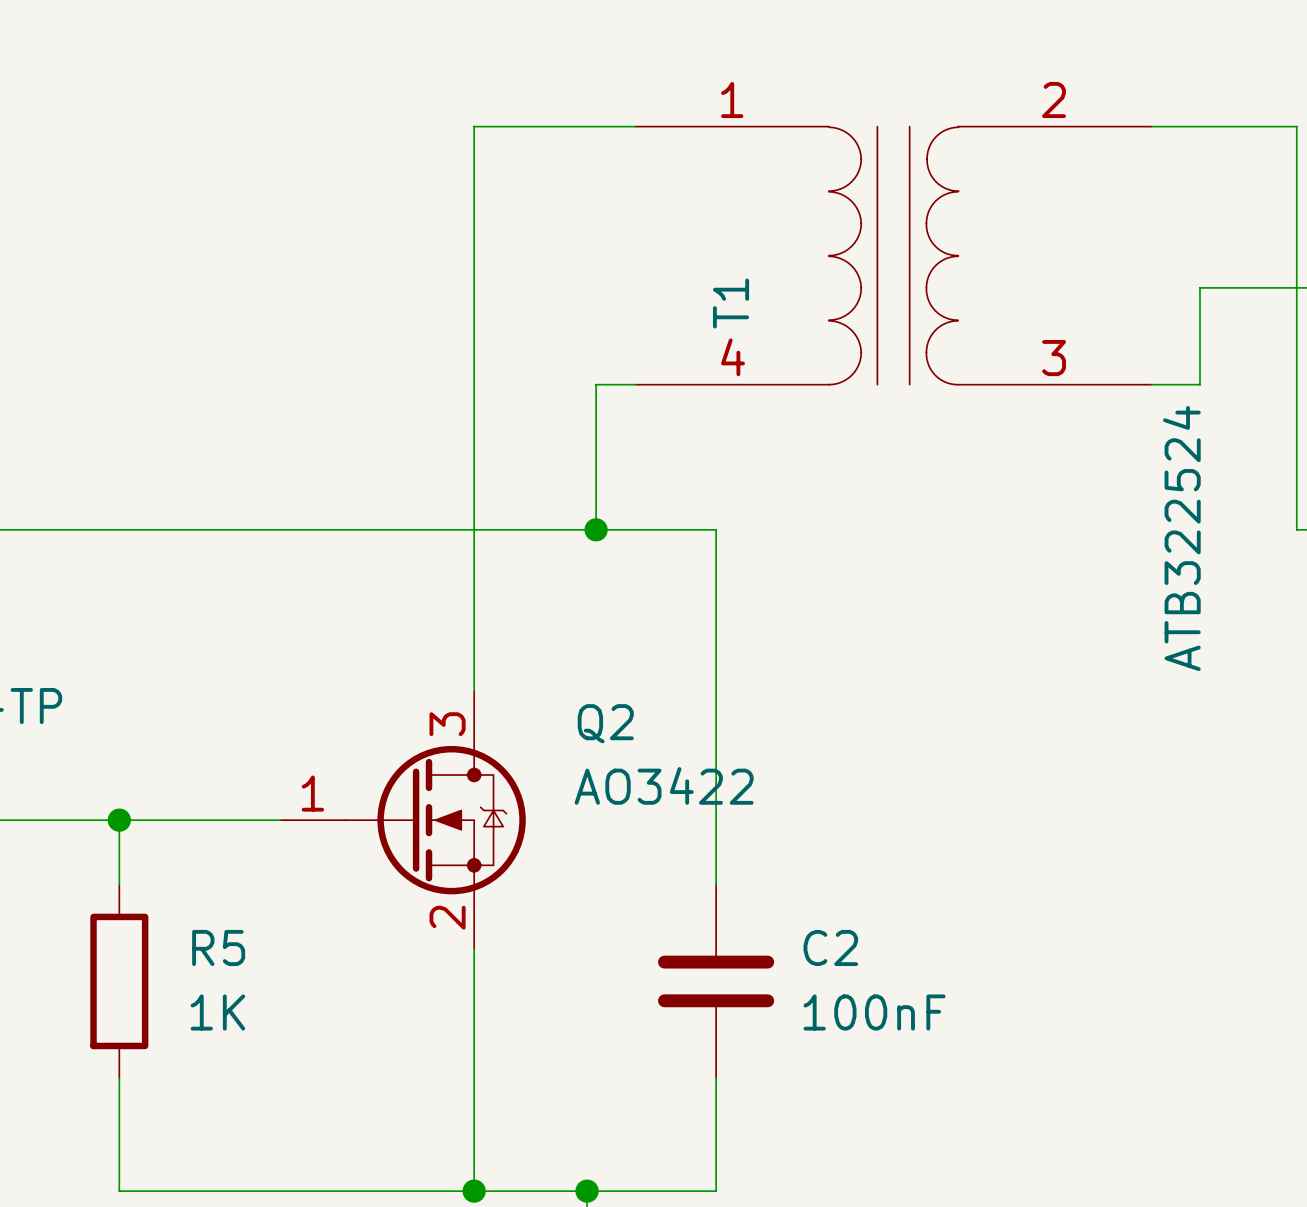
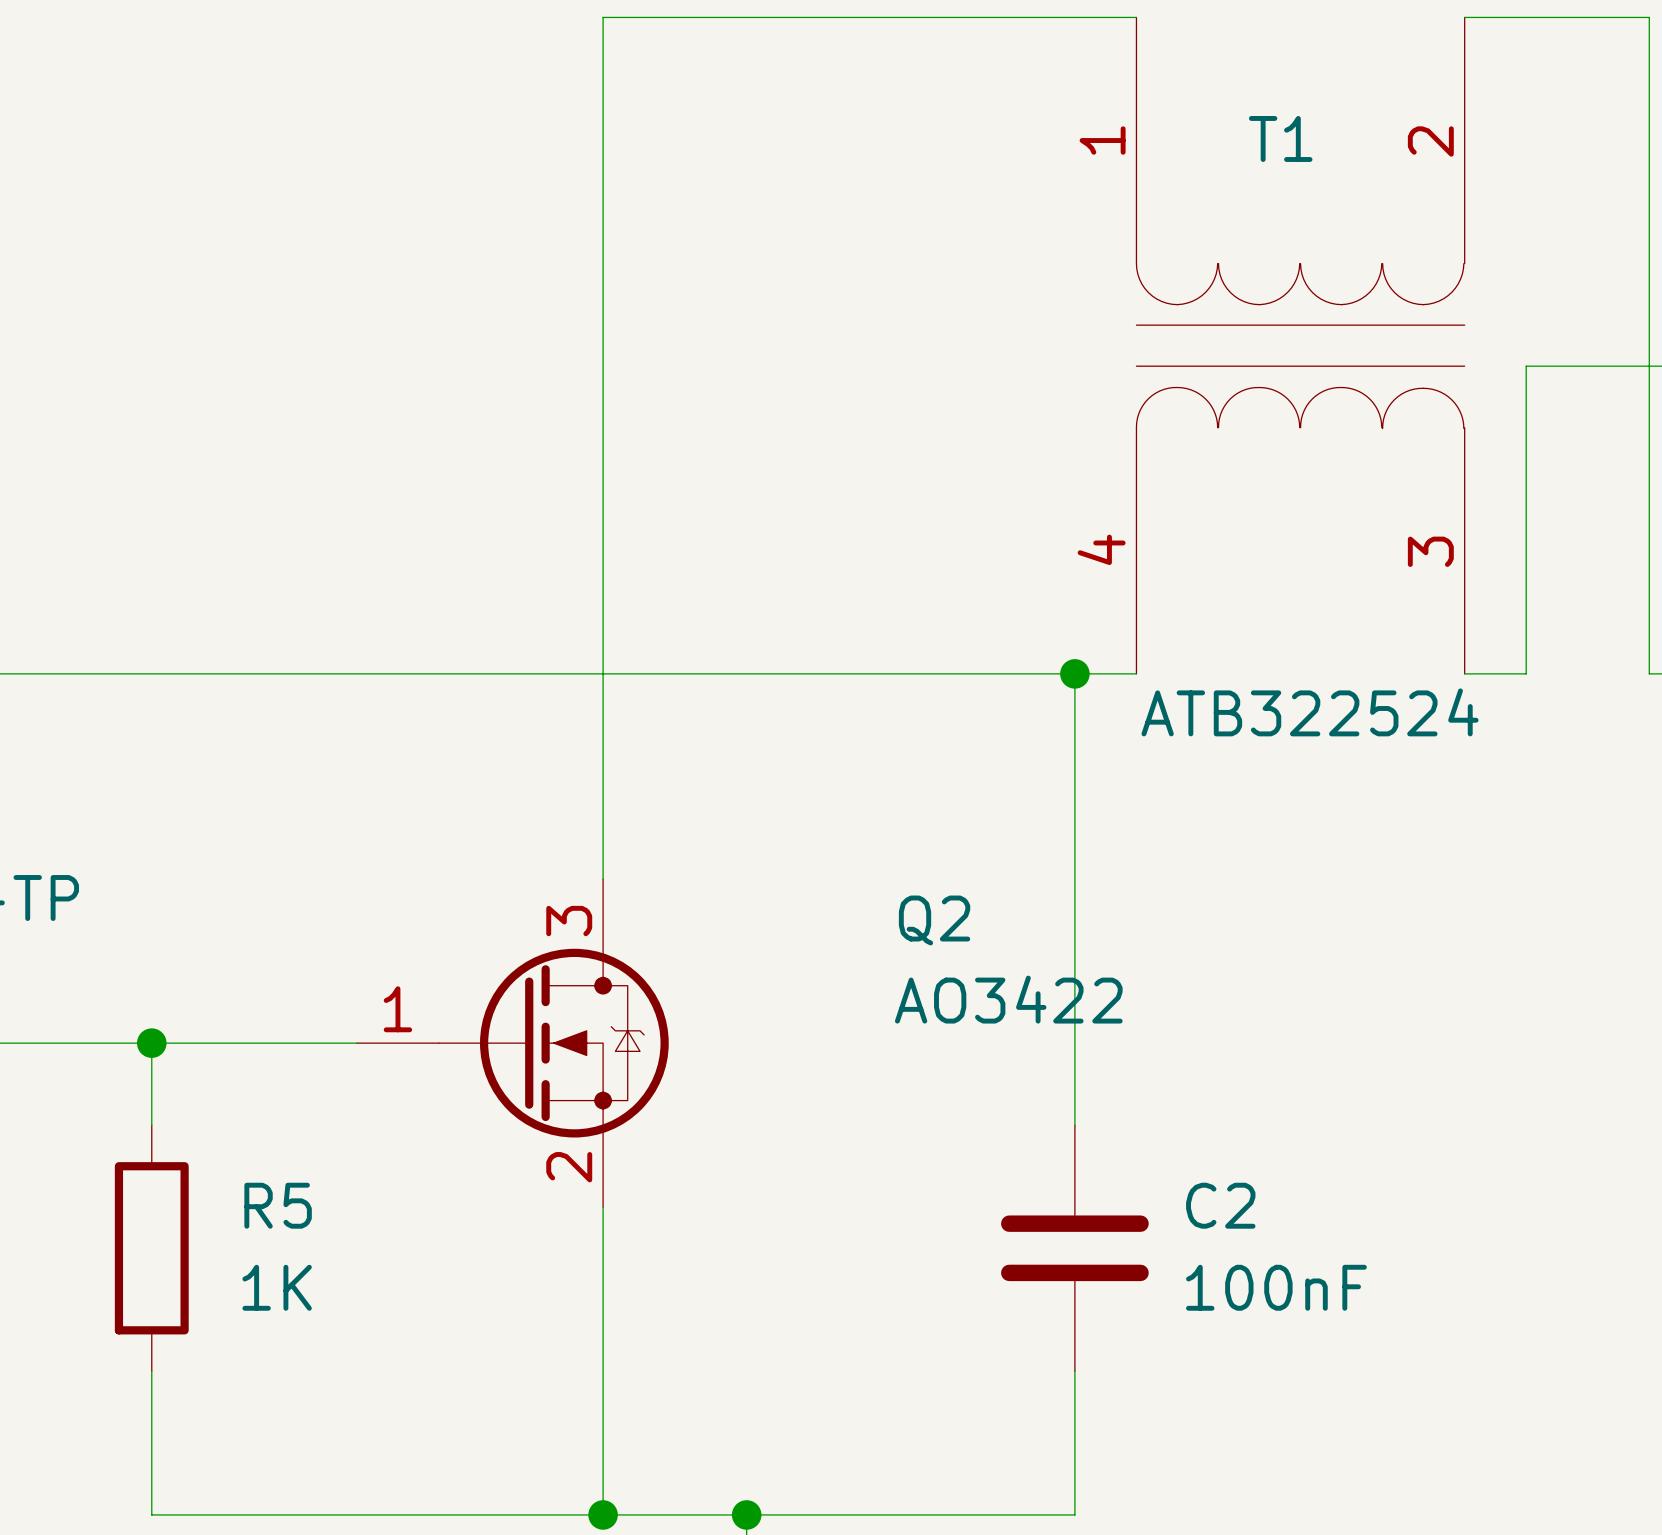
wire: (474, 126) (635, 126) -> (603, 161) (603, 17) (1136, 17)
T1 symbol: [635, 126, 1152, 385] -> [1136, 17, 1465, 674]
wire: (1151, 126) (1296, 126) -> (1464, 17) (1649, 17) (1649, 161)
T1 name position: T1 (731, 303) -> T1 (1280, 138)
wire: (635, 384) (596, 384) (596, 529) -> none
wire: (1151, 384) (1199, 384) -> (1464, 673) (1526, 673) (1526, 489)
junction: (596, 529) -> none
wire: (716, 529) (716, 884) -> (910, 673) (1136, 673)
wire: none -> (1074, 673) (1074, 1125)
junction: none -> (1074, 673)
T1 value position: ATB322524 (1181, 538) -> ATB322524 (1310, 712)
Q2 name position: Q2 (605, 723) -> Q2 (934, 920)
Q2 value position: AO3422 (664, 785) -> AO3422 (1008, 999)
C2 position: (716, 981) -> (1074, 1248)
wire: (716, 1078) (716, 1191) -> (1074, 1371) (1074, 1514) (910, 1514)

